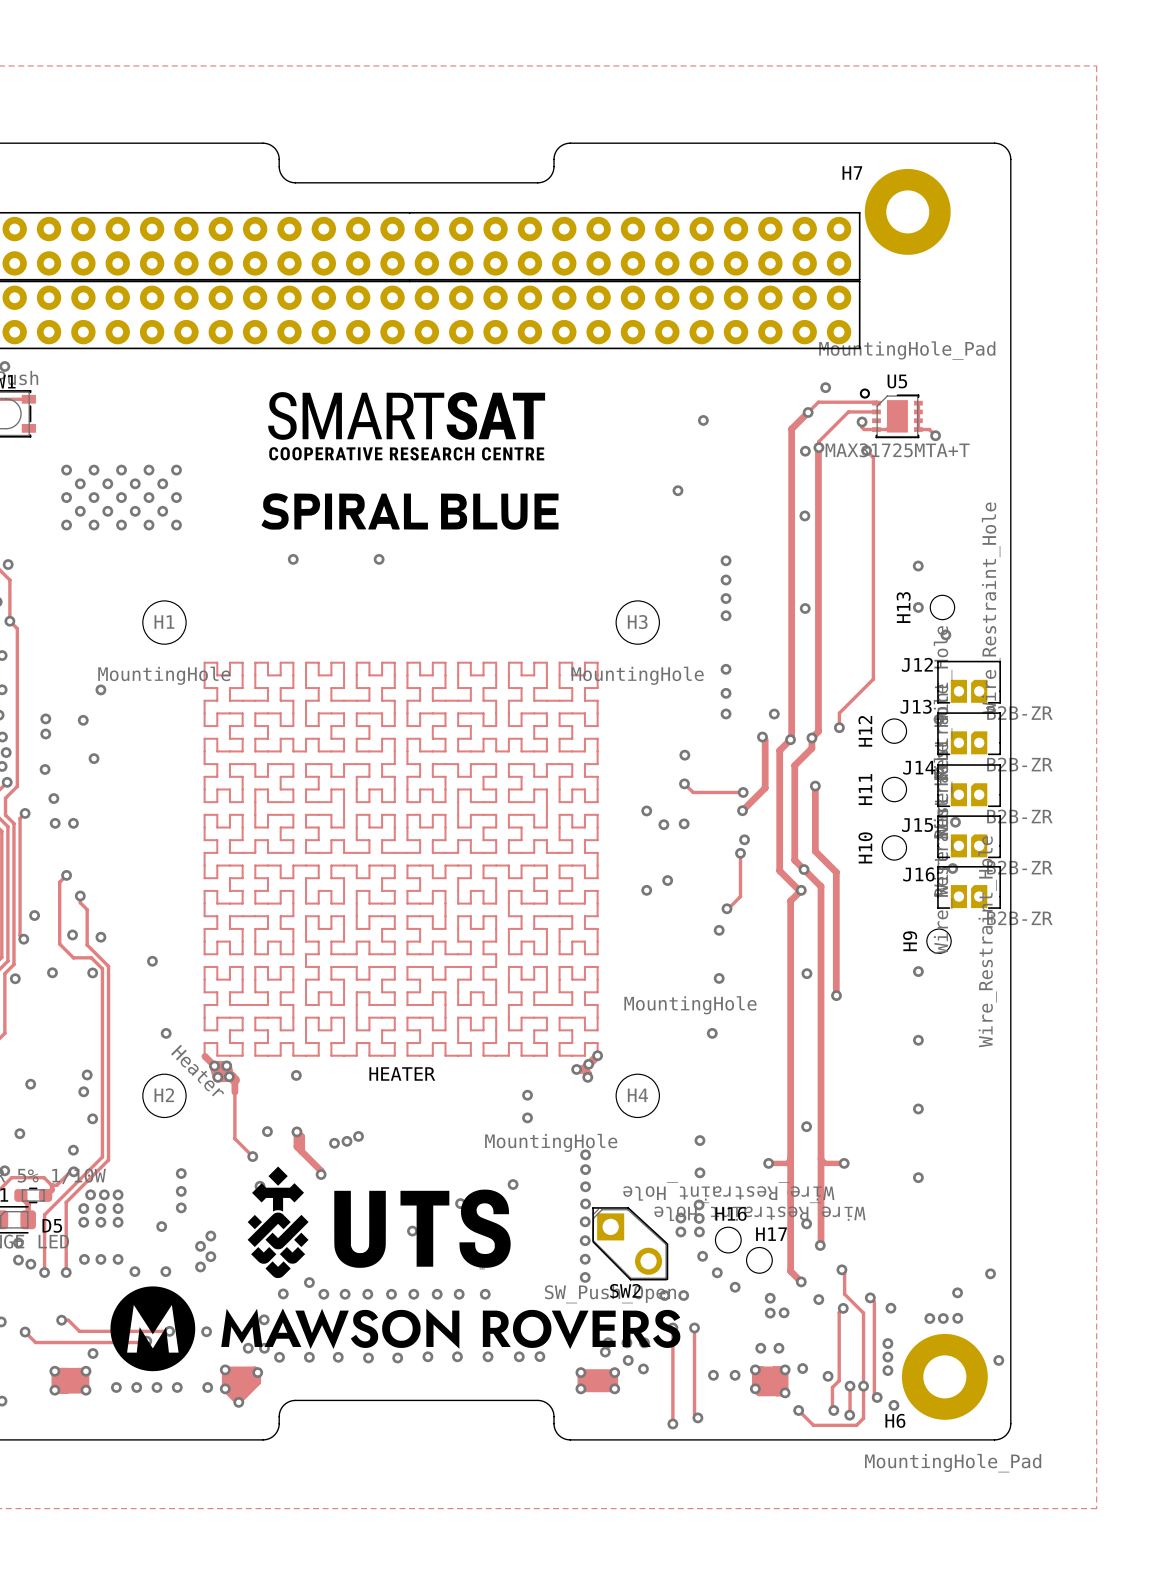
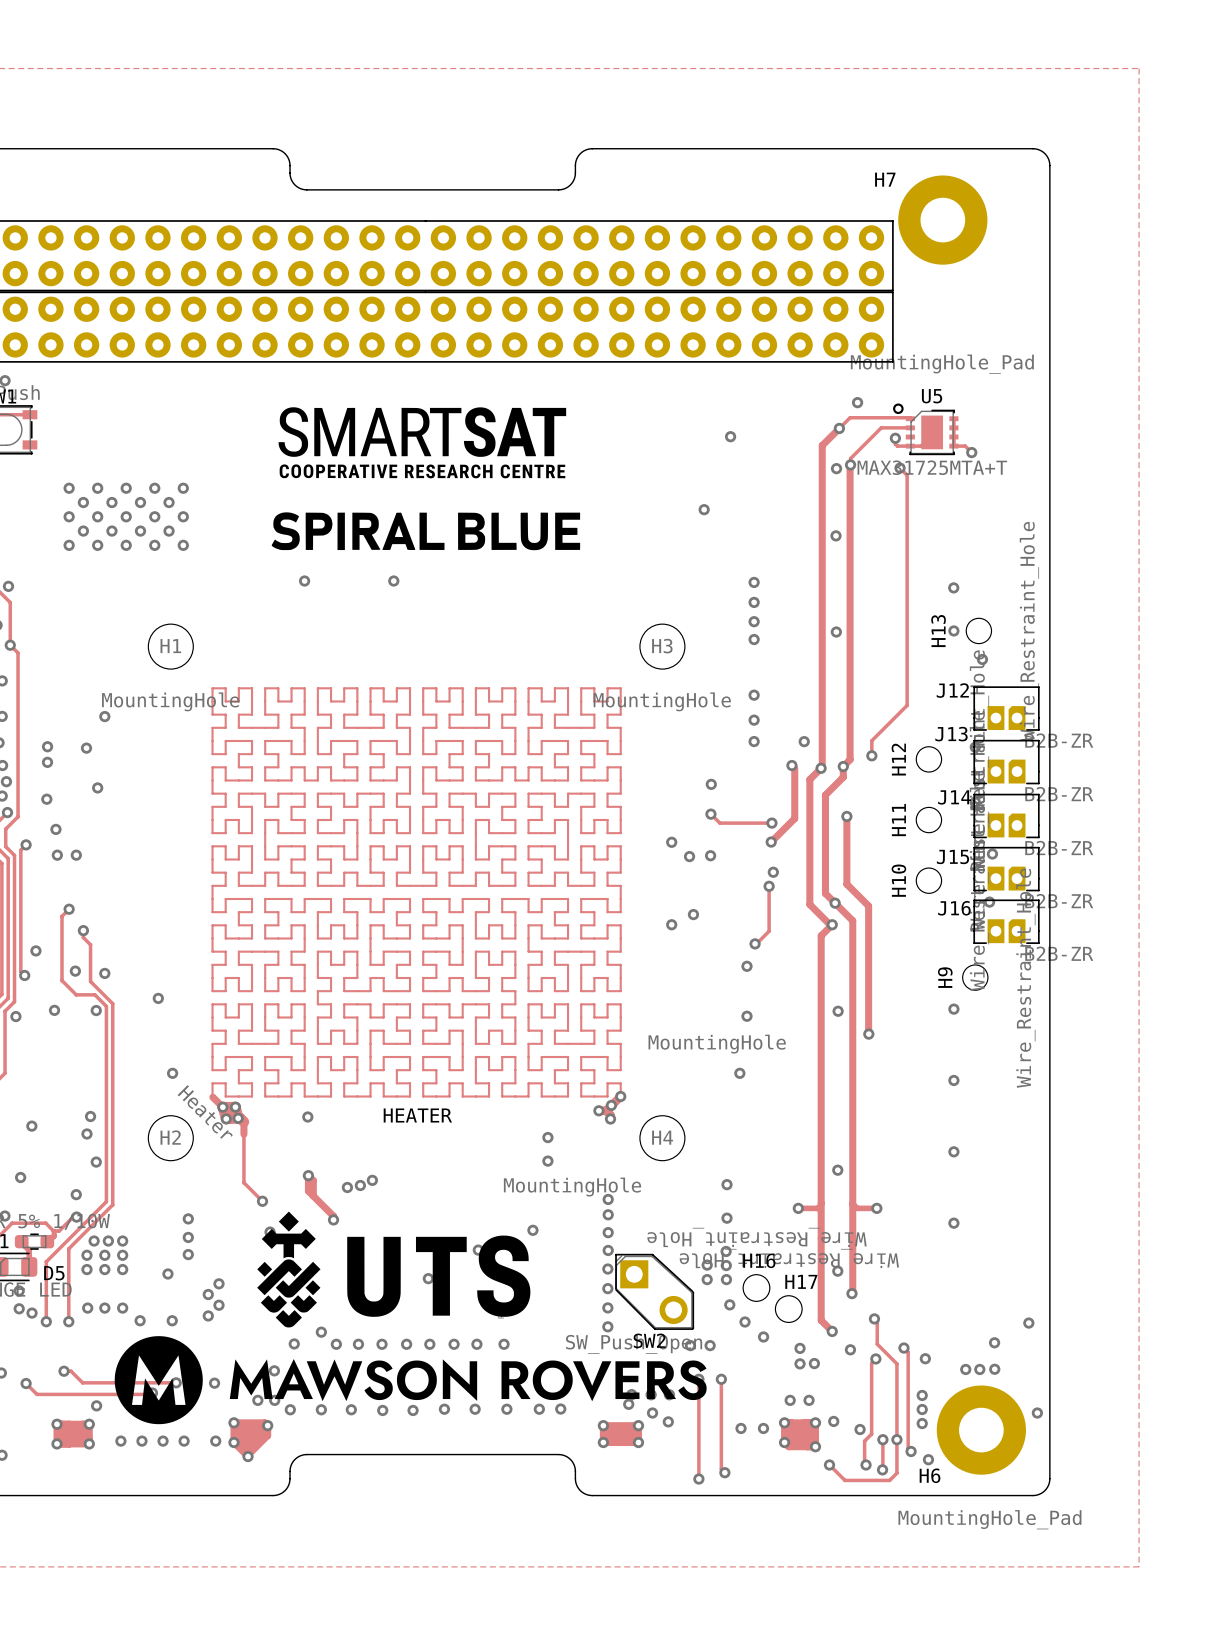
via: (267, 1131) -> none

